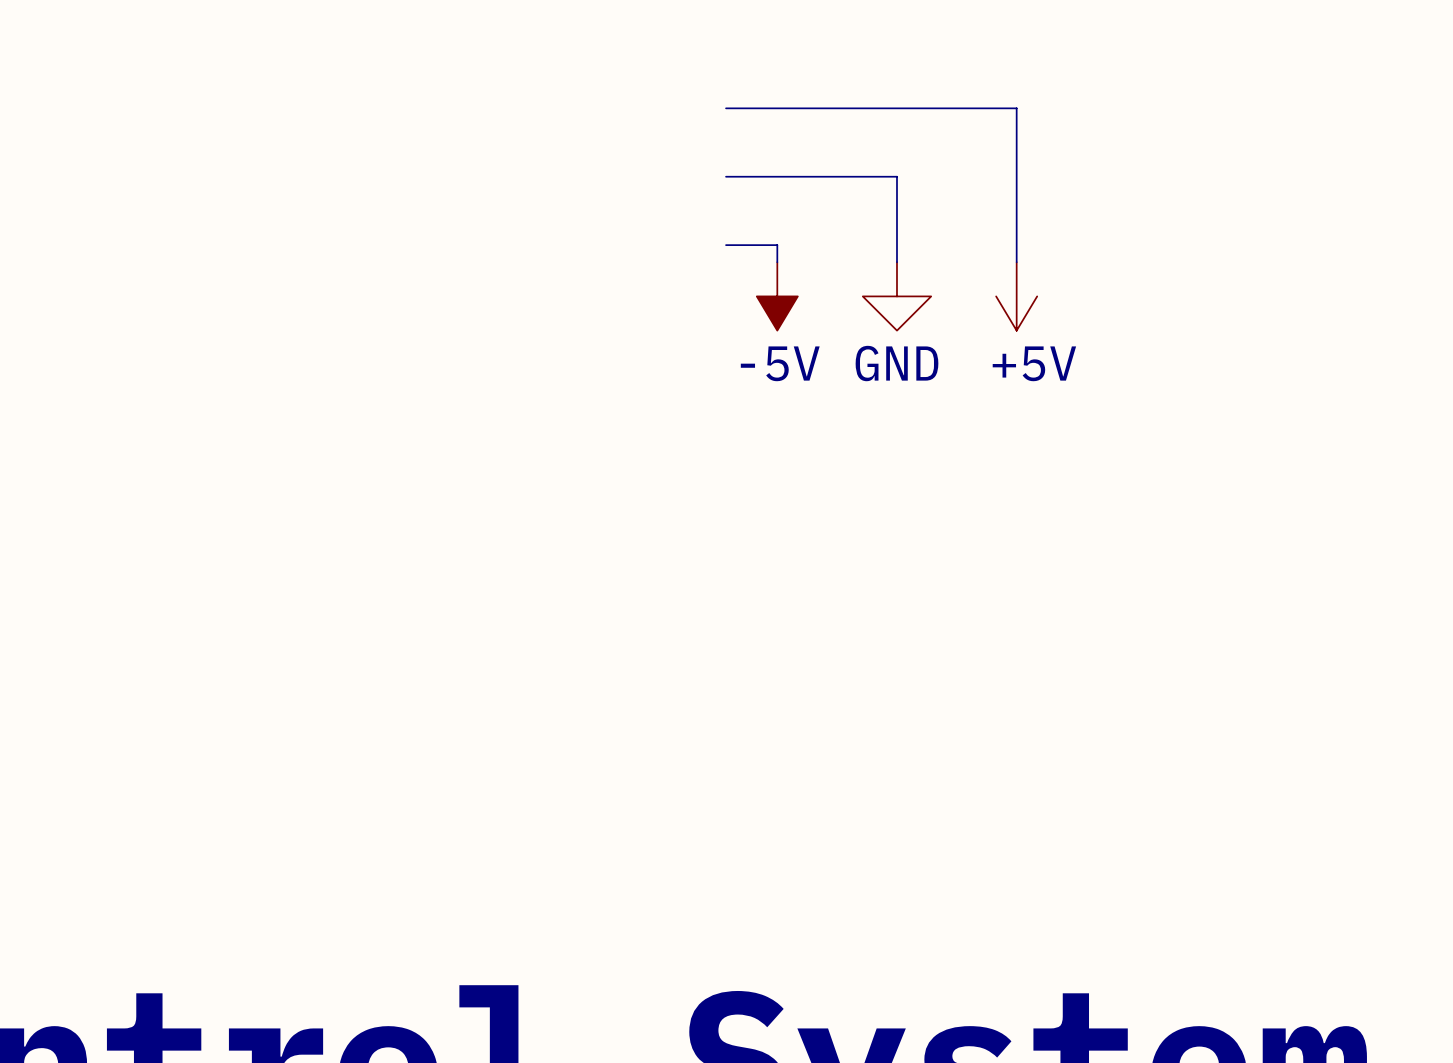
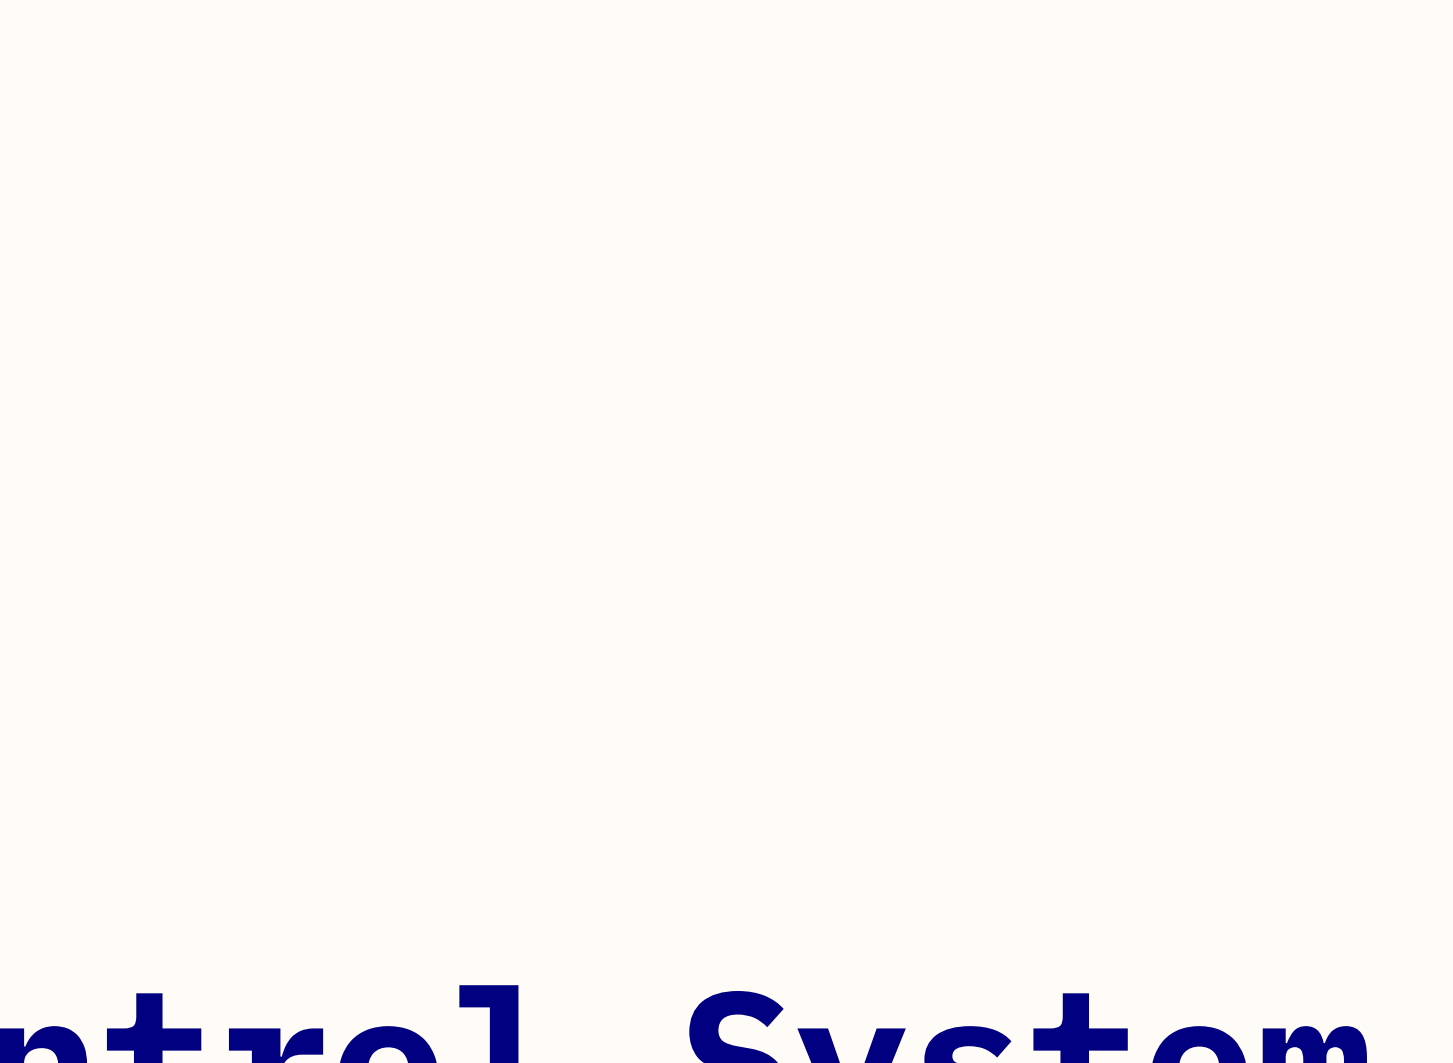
wire: (726, 108) (1016, 108) (1016, 262) -> none
wire: (726, 176) (896, 176) (896, 262) -> none
wire: (726, 245) (777, 245) (777, 262) -> none
power symbol: -5V (777, 296) -> none
power symbol: GND (896, 296) -> none
power symbol: +5V (1016, 296) -> none

